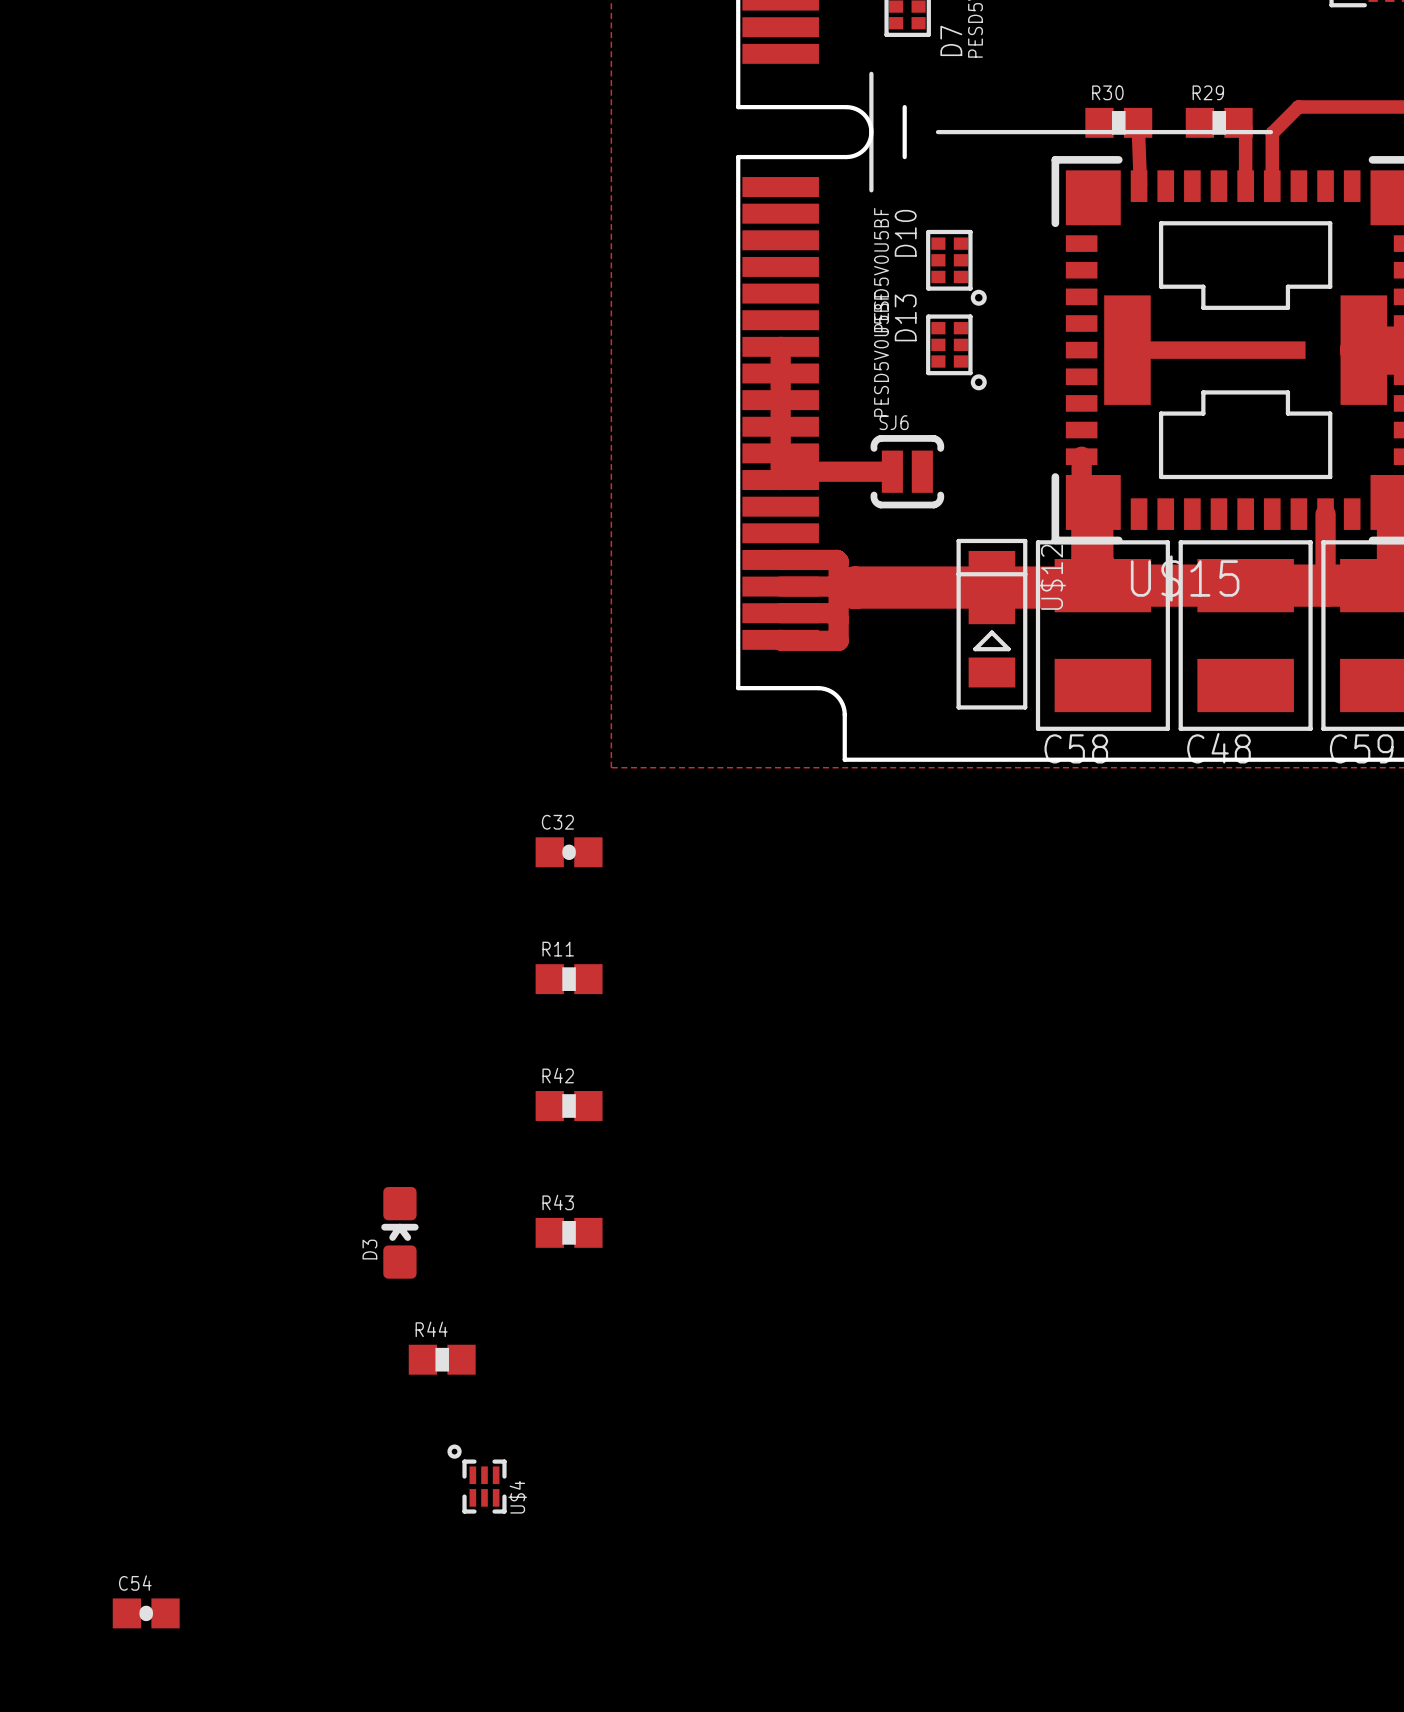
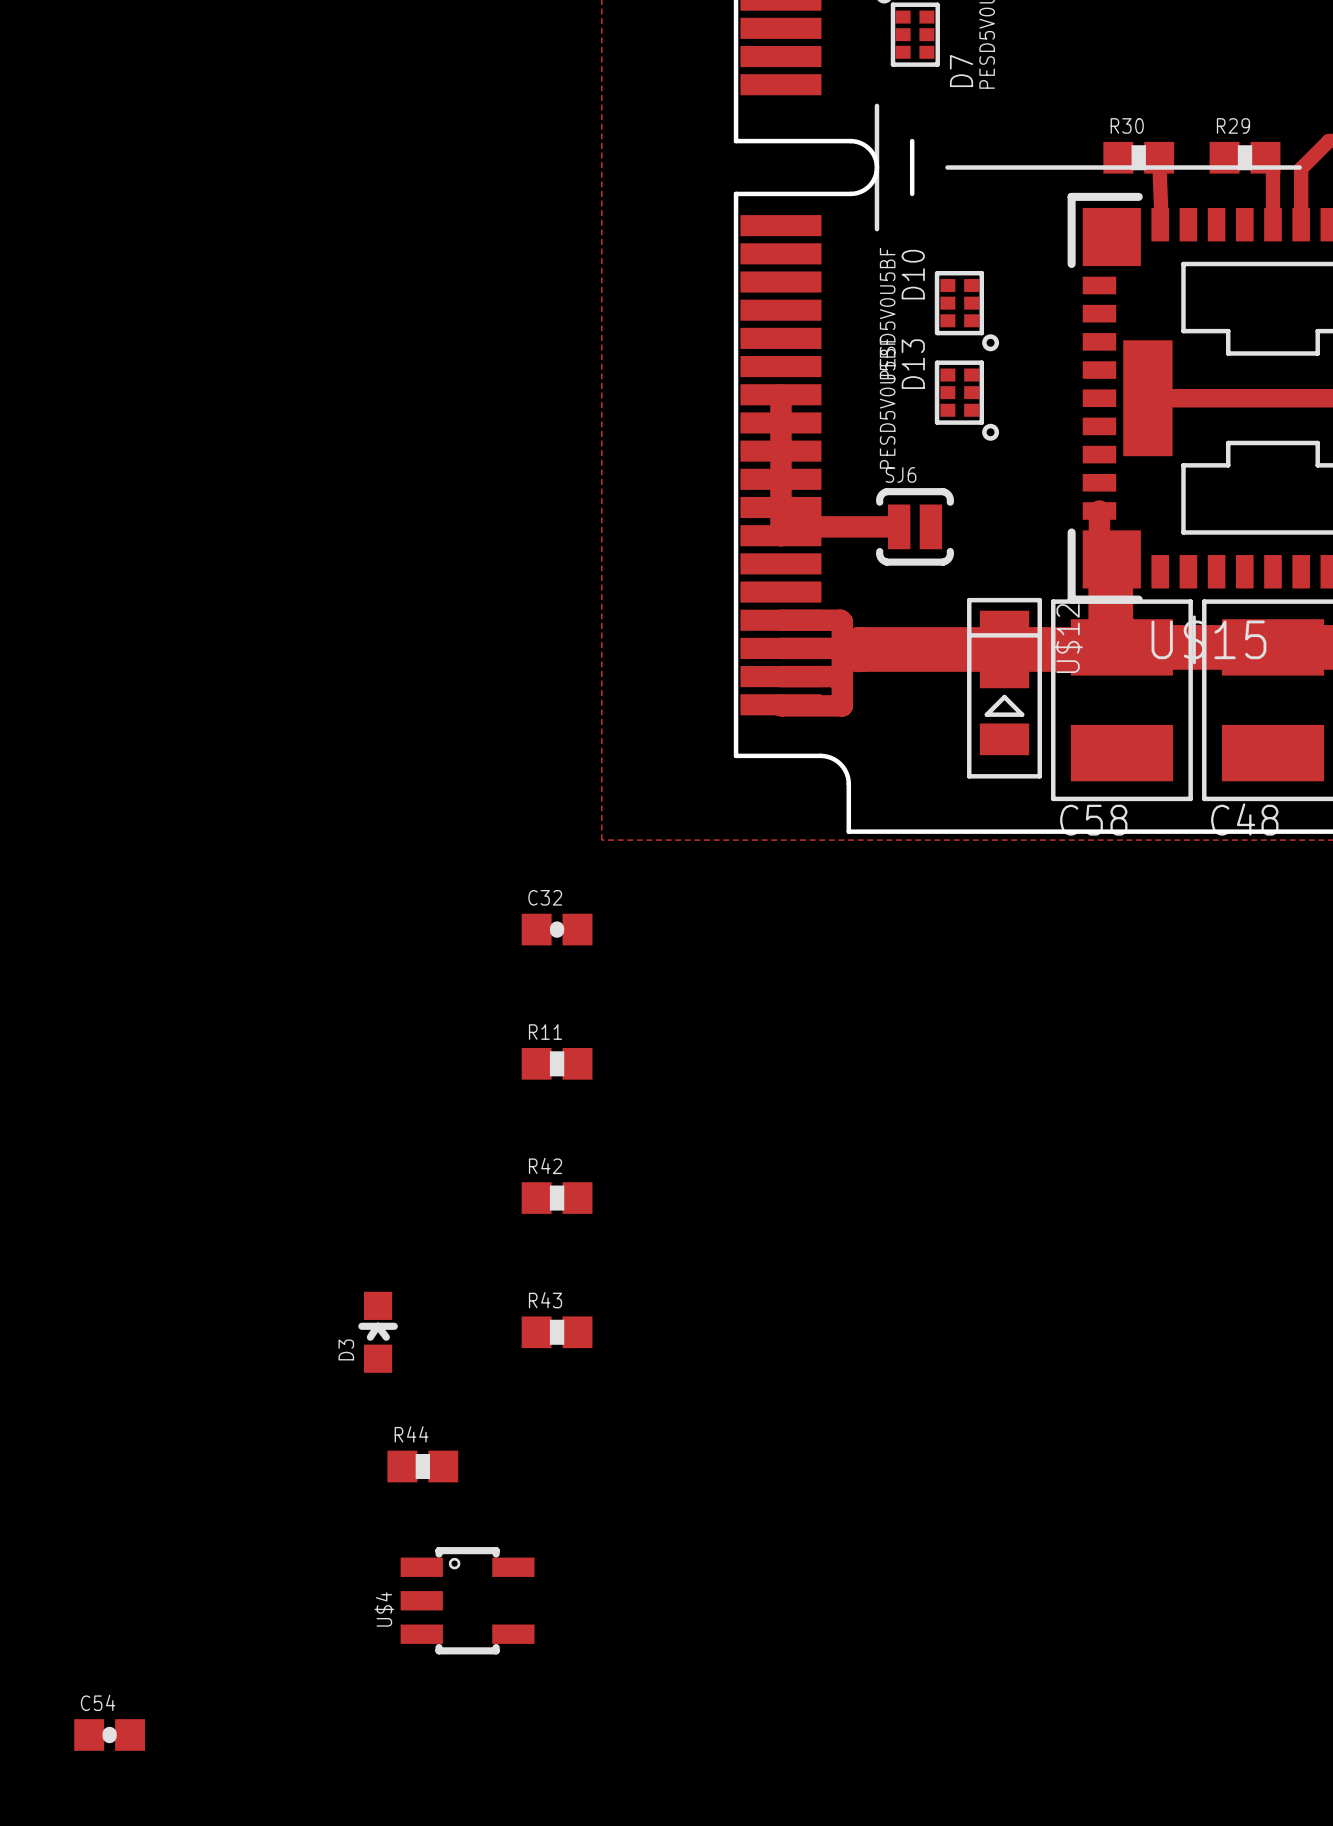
D3 footprint: [381, 1187, 419, 1279] -> [358, 1291, 398, 1373]
U$4 footprint: [447, 1444, 507, 1514] -> [400, 1547, 535, 1655]
U$4 name position: U$4 (517, 1497) -> U$4 (384, 1609)

